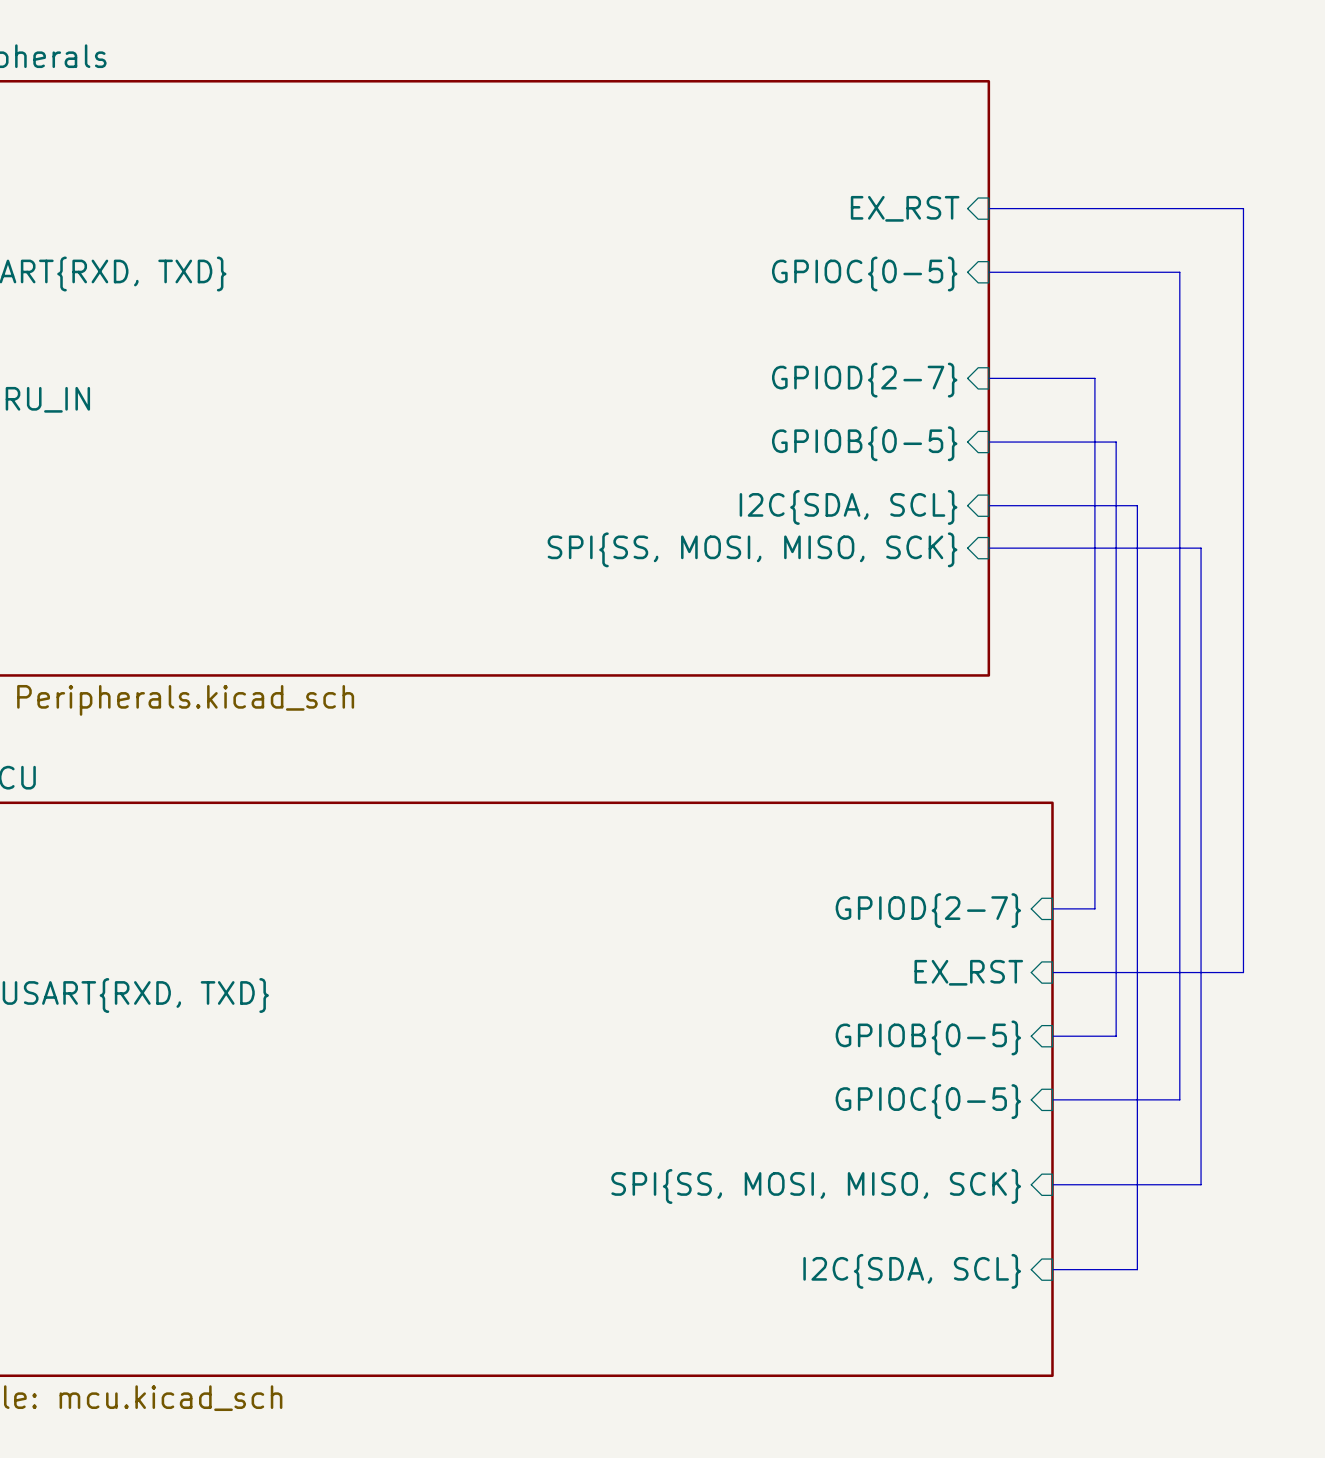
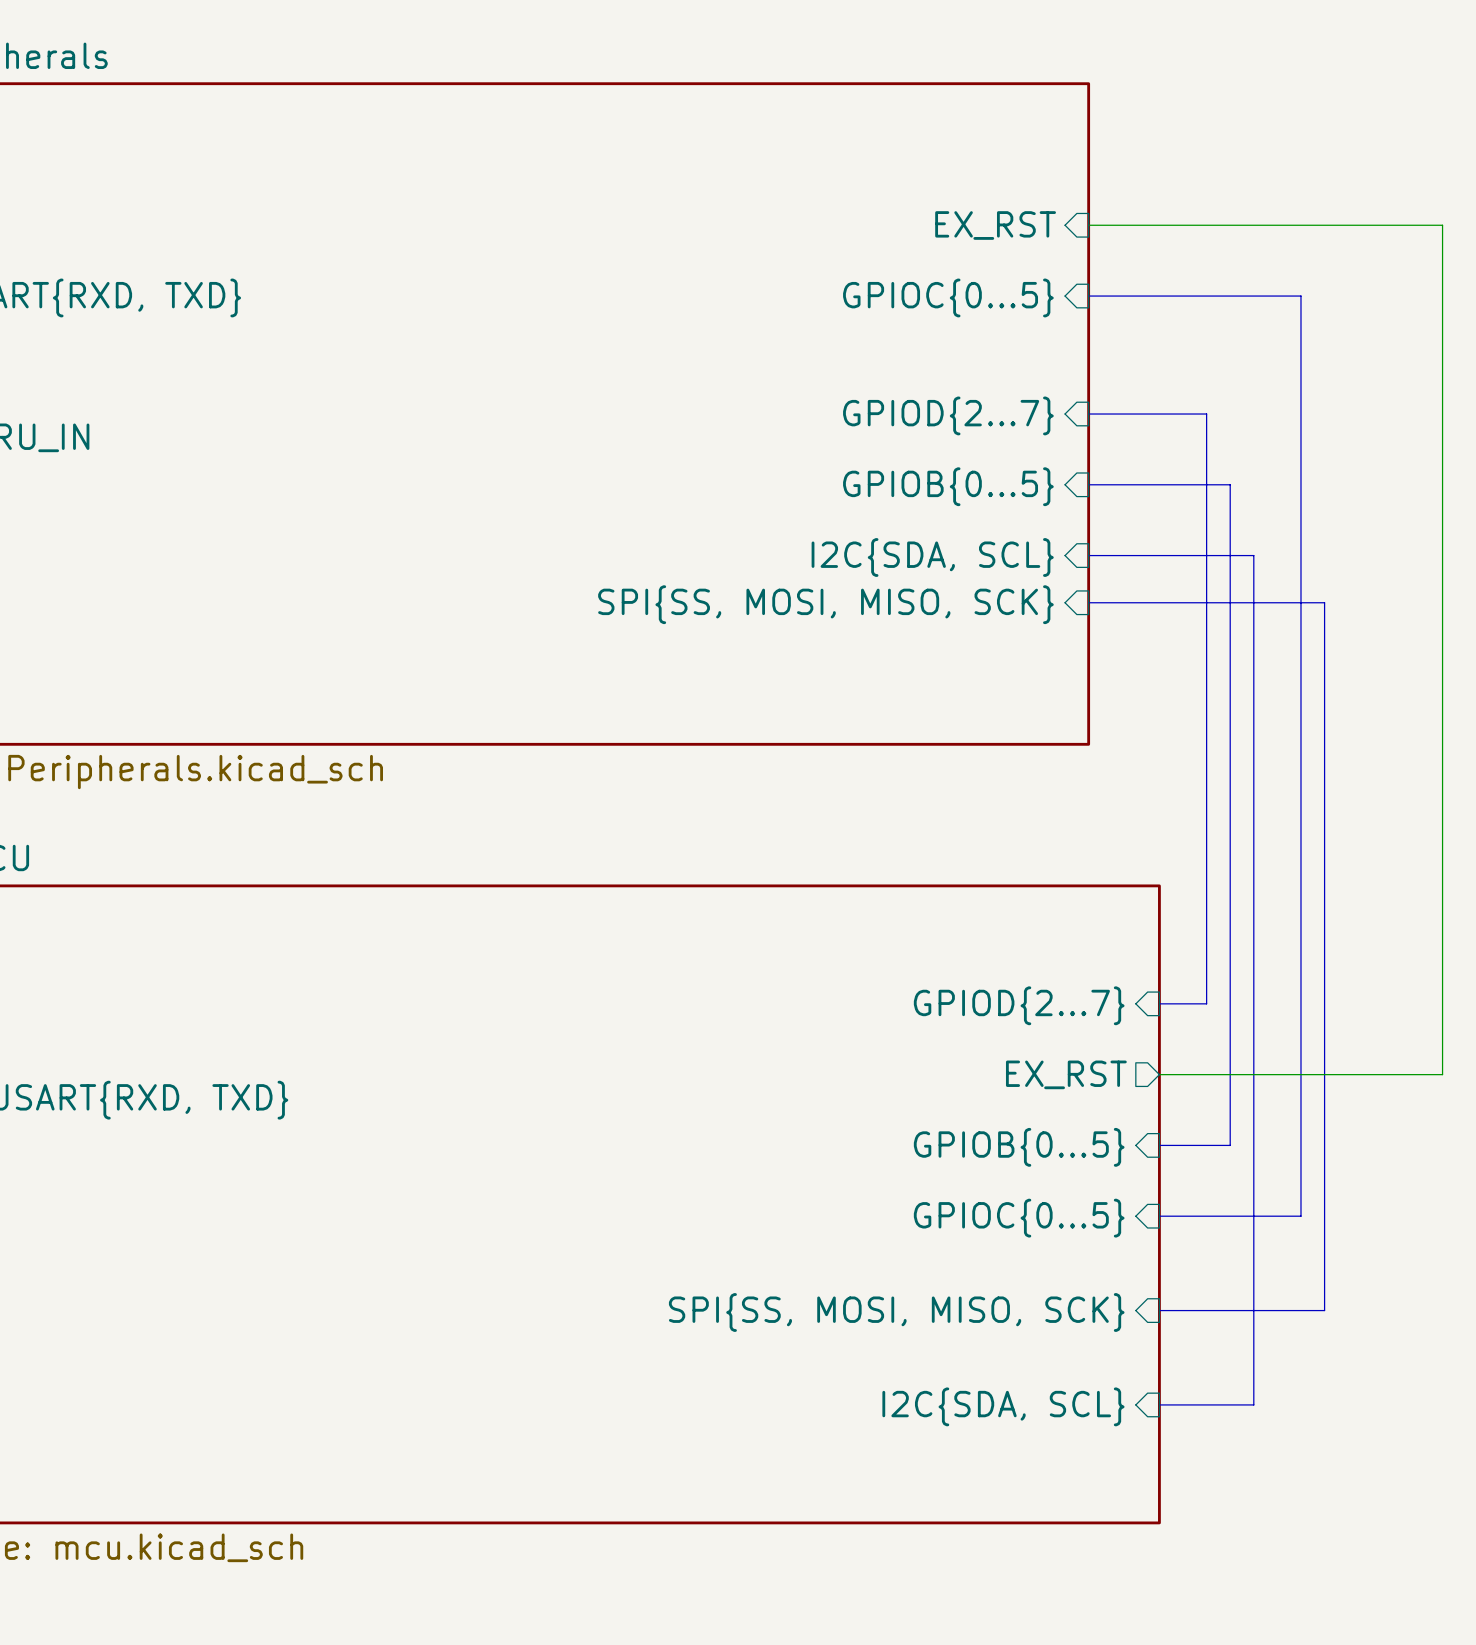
bus: (988, 208) (1243, 208) (1243, 972) (1052, 972) -> none
wire: none -> (1088, 225) (1442, 225) (1442, 1074) (1159, 1074)
sheet pin: GPIOC{0-5} (864, 274) -> GPIOC{0...5} (948, 297)
sheet pin: GPIOD{2-7} (864, 380) -> GPIOD{2...7} (948, 415)
sheet pin: GPIOB{0-5} (864, 443) -> GPIOB{0...5} (948, 486)
sheet pin: GPIOD{2-7} (928, 910) -> GPIOD{2...7} (1019, 1005)
sheet pin shape: input (968, 972) -> output (1066, 1074)
sheet pin: GPIOB{0-5} (928, 1037) -> GPIOB{0...5} (1019, 1147)
sheet pin: GPIOC{0-5} (928, 1101) -> GPIOC{0...5} (1019, 1218)

